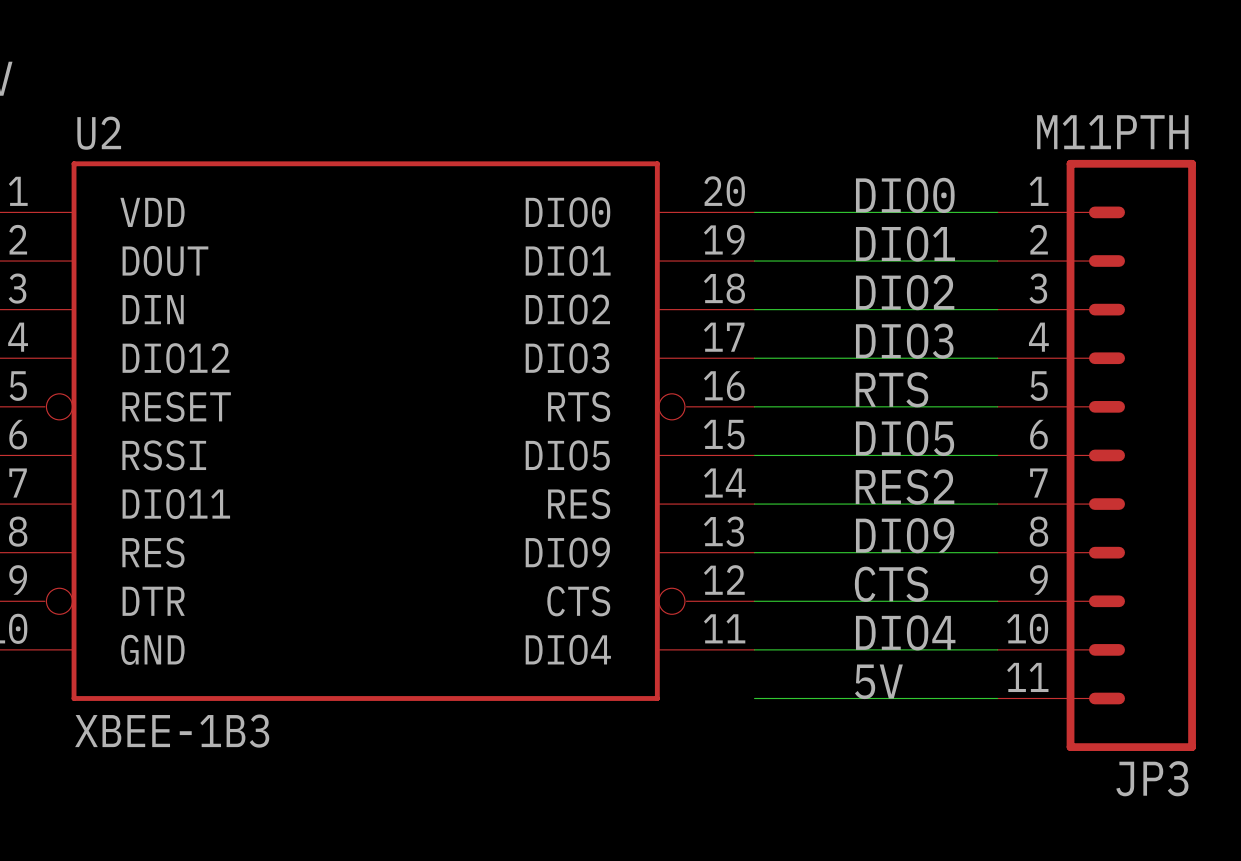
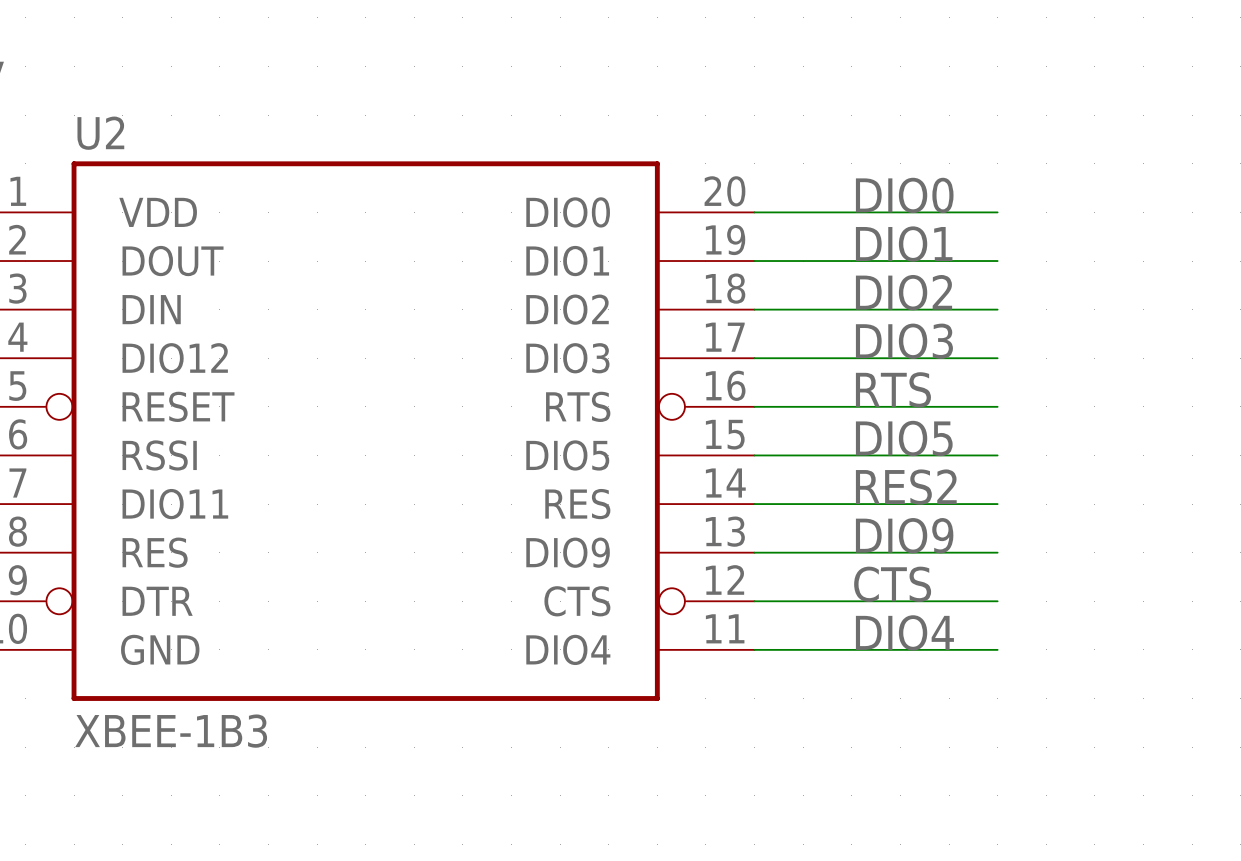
JP3: M11PTH (1096, 455) -> none
label: 5V (878, 681) -> none
wire: (754, 698) (997, 698) -> none

